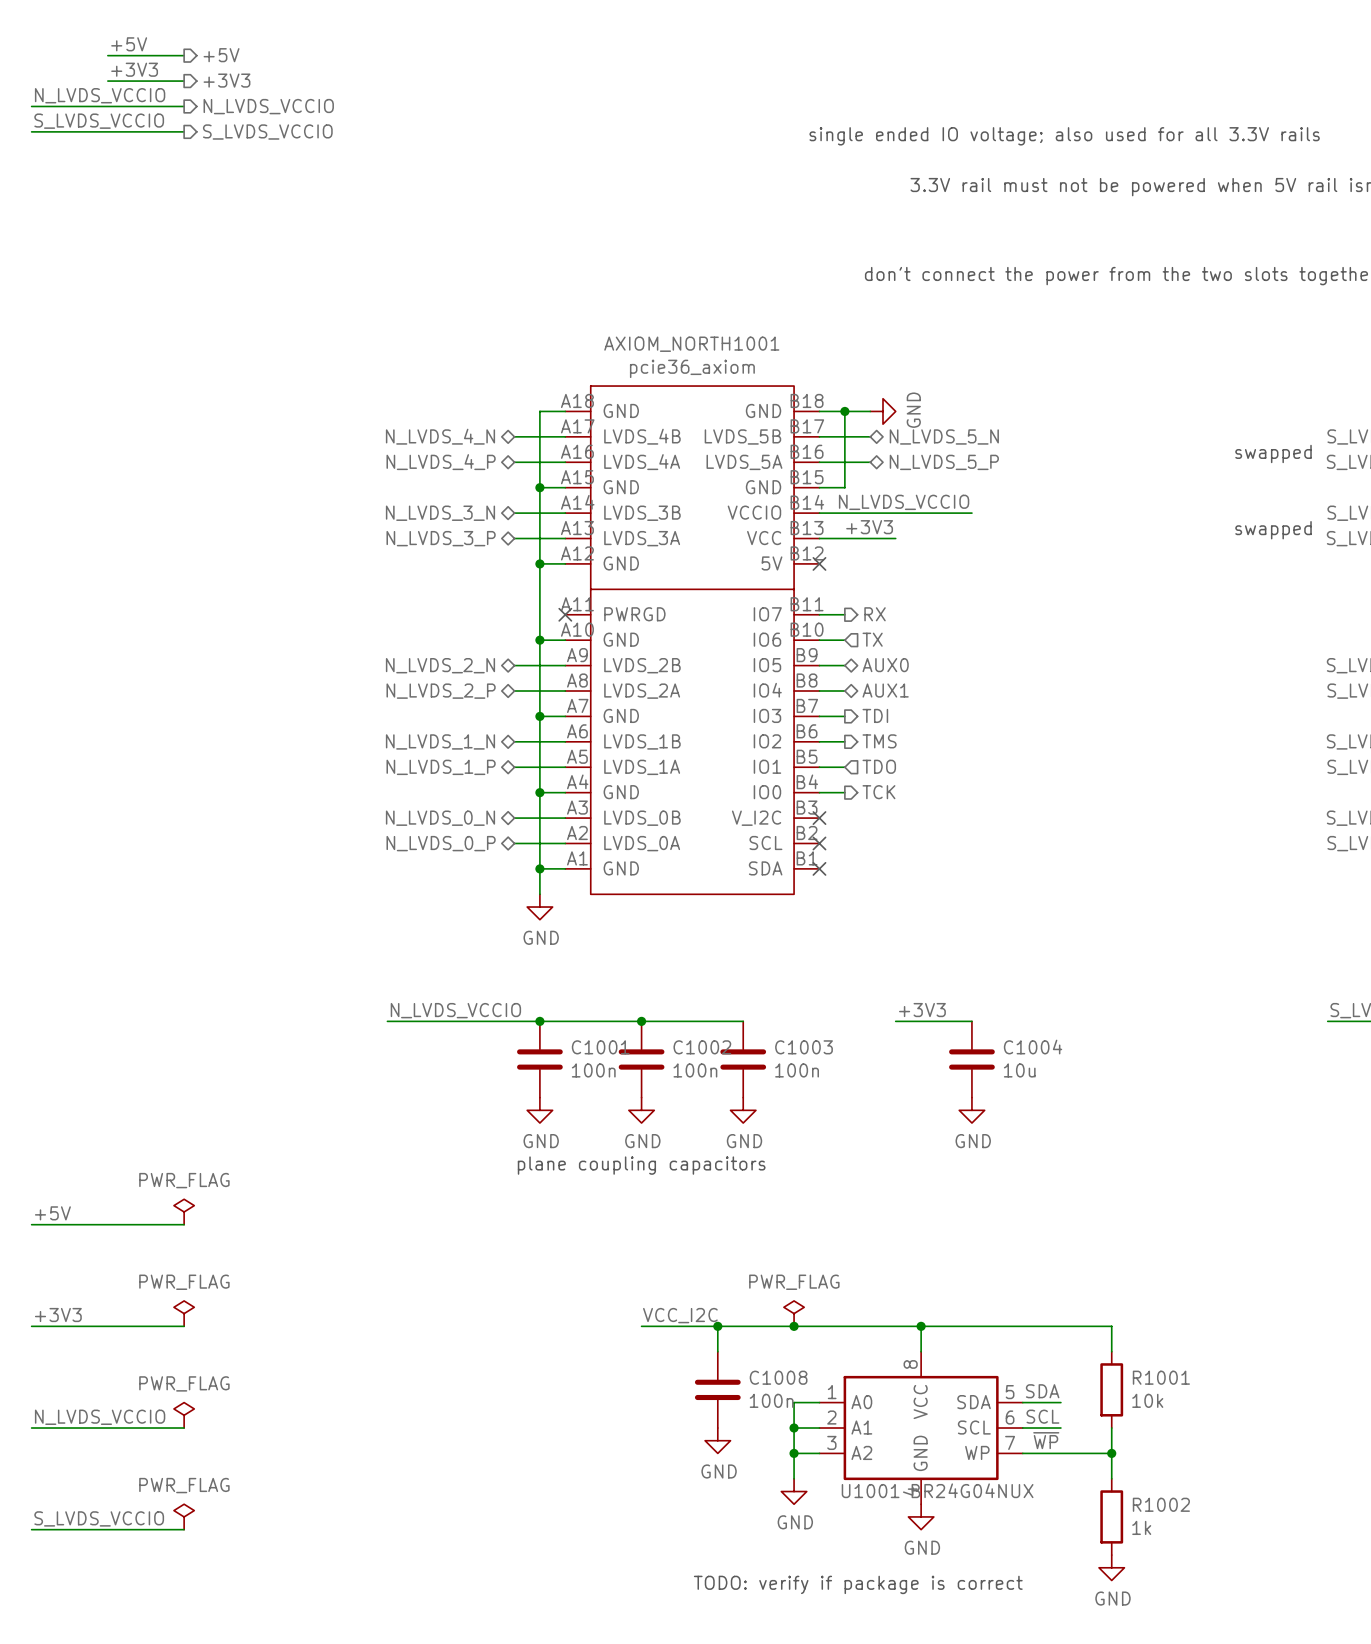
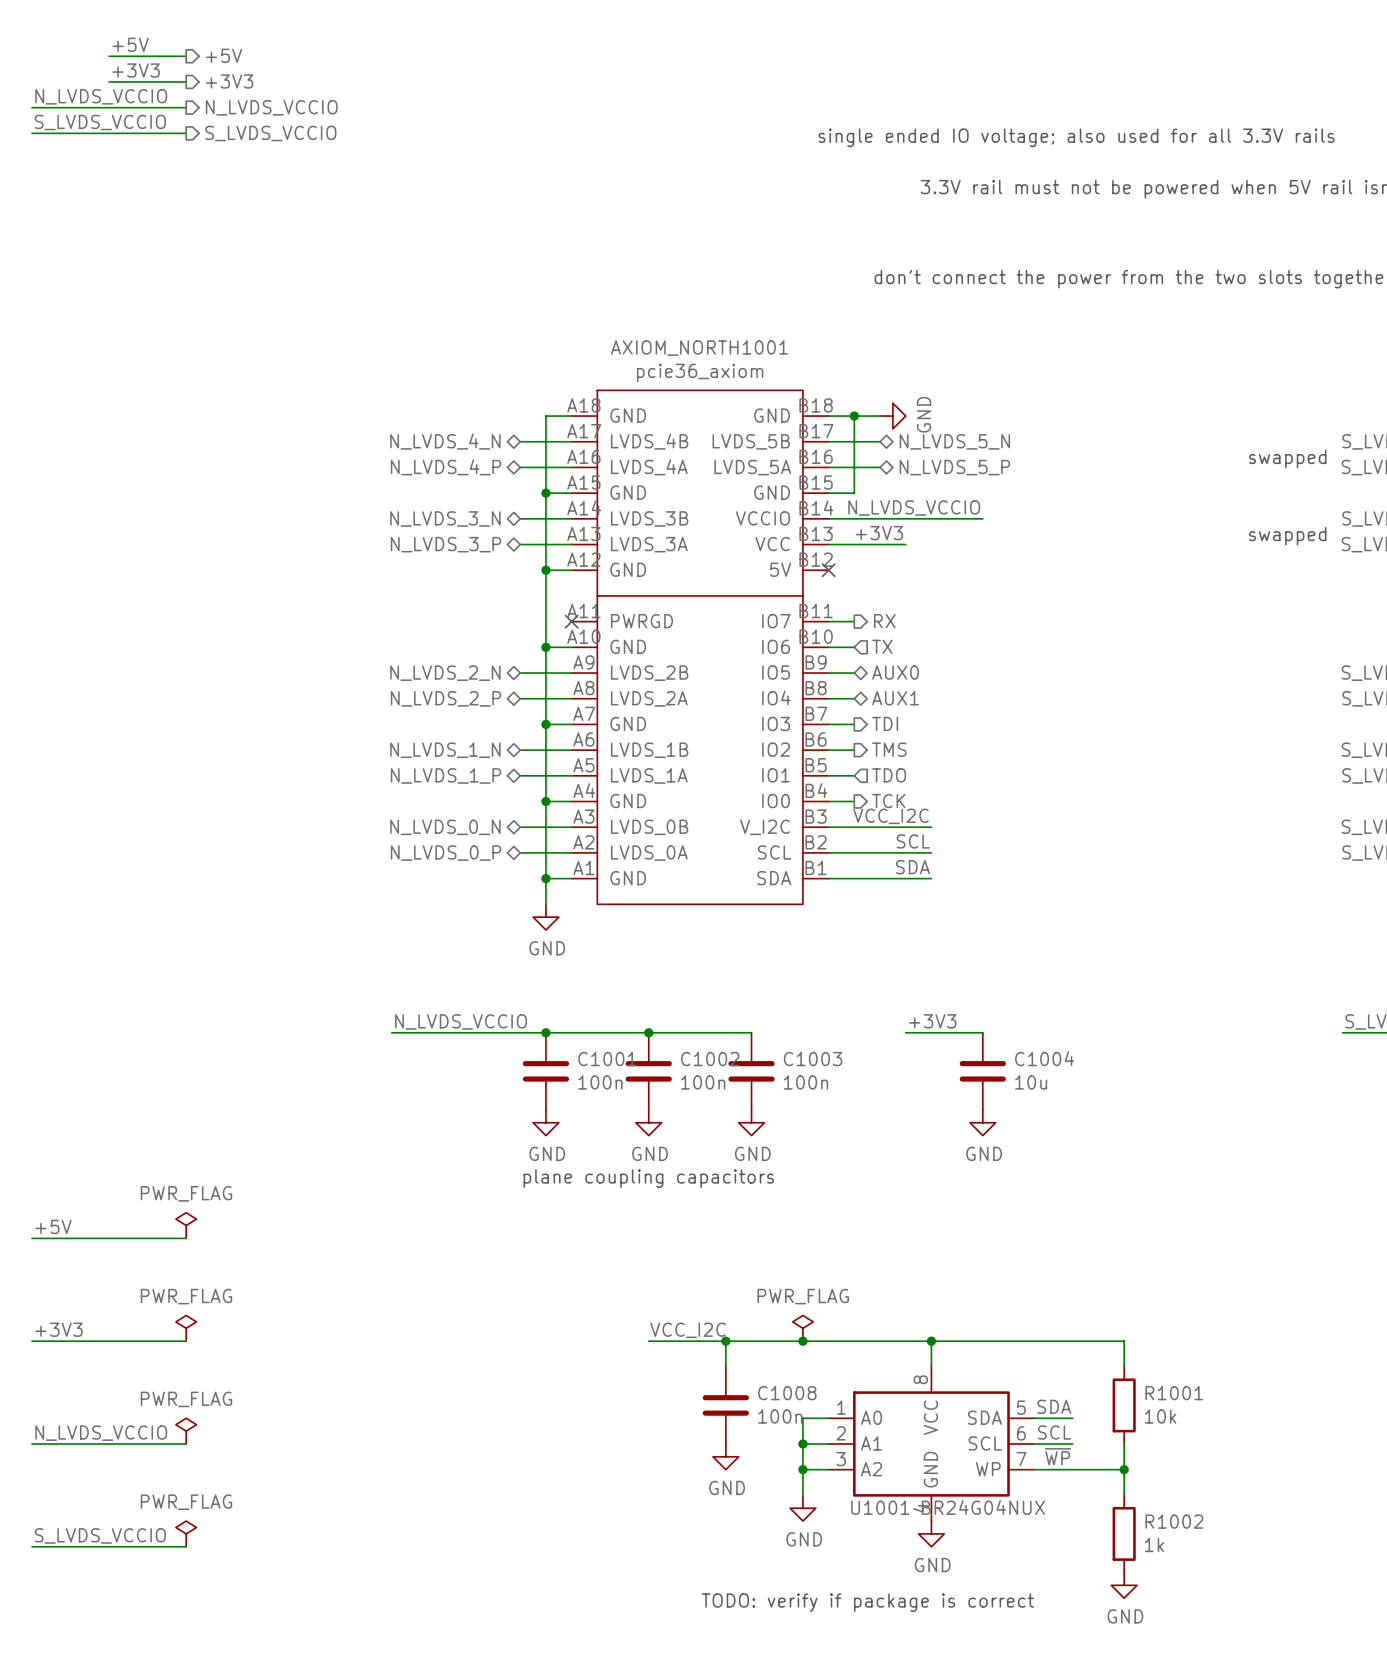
label: none -> VCC_I2C (890, 816)
wire: none -> (828, 827) (931, 827)
no-connect mark: (819, 818) -> none
label: none -> SCL (913, 841)
wire: none -> (828, 852) (931, 852)
no-connect mark: (819, 843) -> none
label: none -> SDA (912, 867)
wire: none -> (828, 878) (931, 878)
no-connect mark: (819, 868) -> none

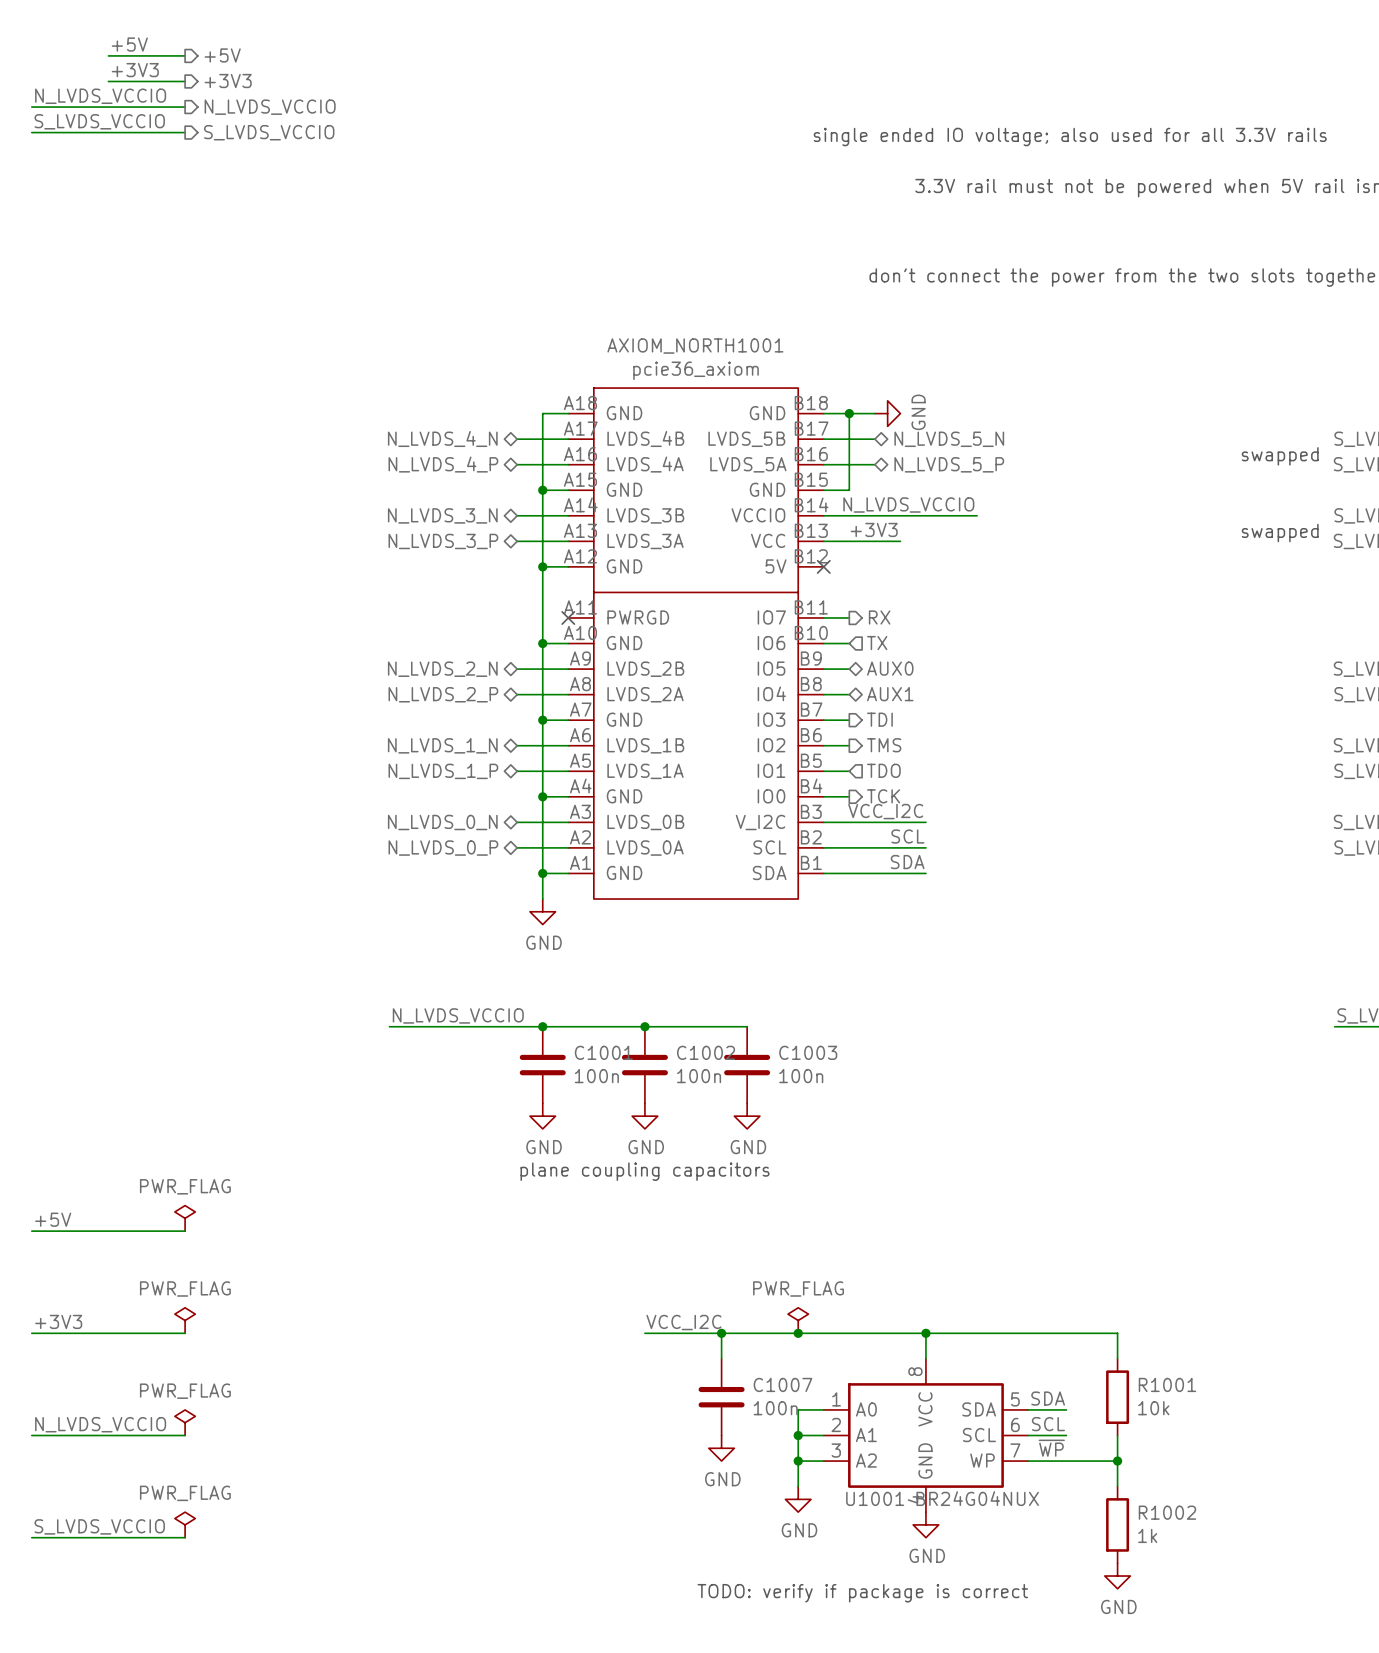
label: +3V3 (932, 1021) -> none
wire: (905, 1032) (982, 1032) -> none
C1004: 10u (982, 1071) -> none
power symbol: GND (982, 1122) -> none
C1008 name: C1008 (787, 1393) -> C1007 (782, 1384)

